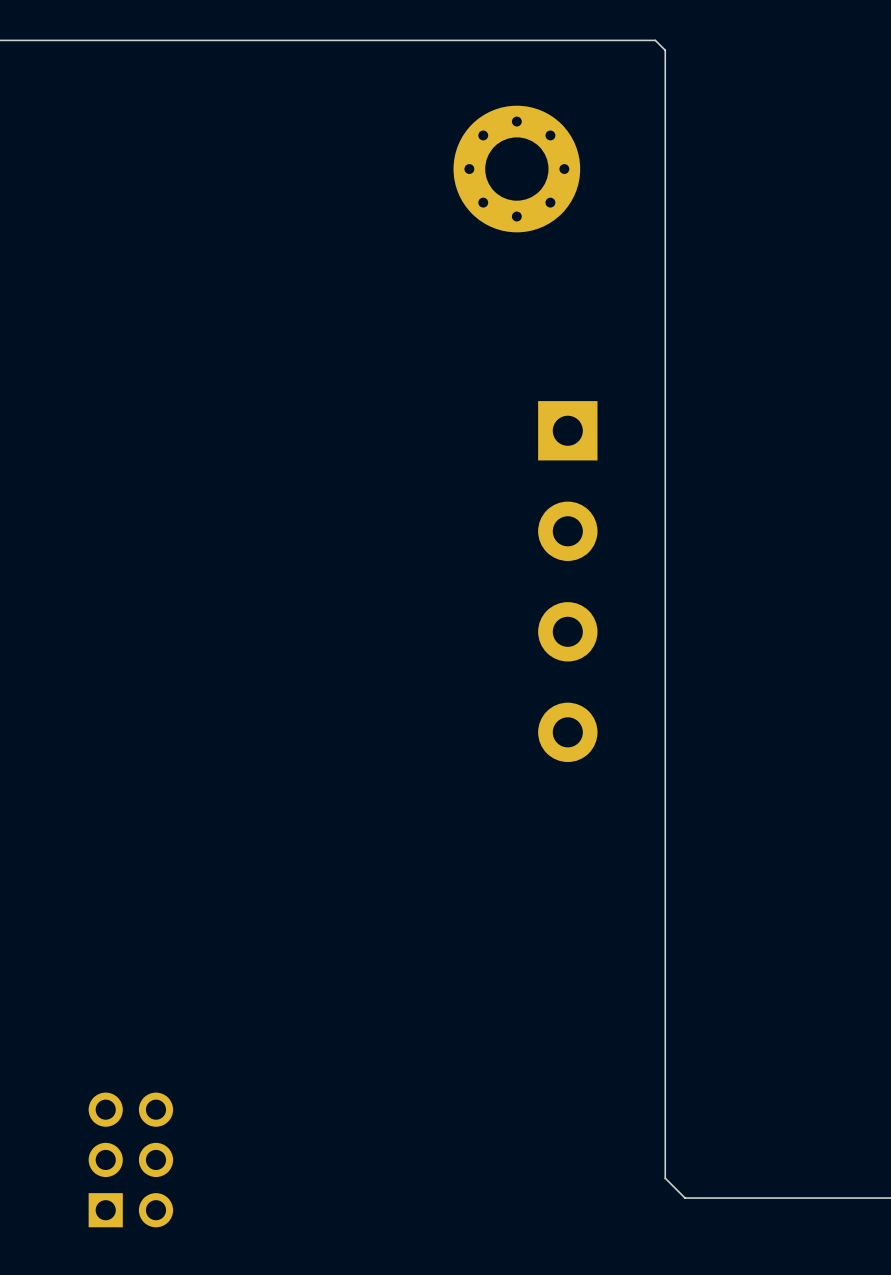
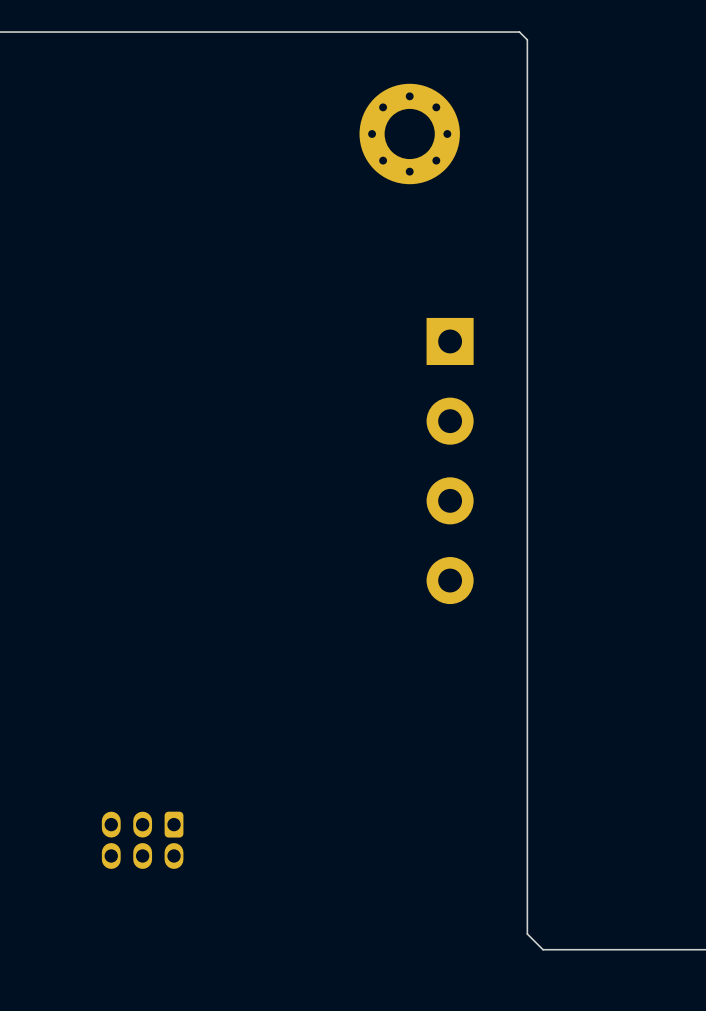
part: none -> (142, 840)
part: (130, 1159) -> none

